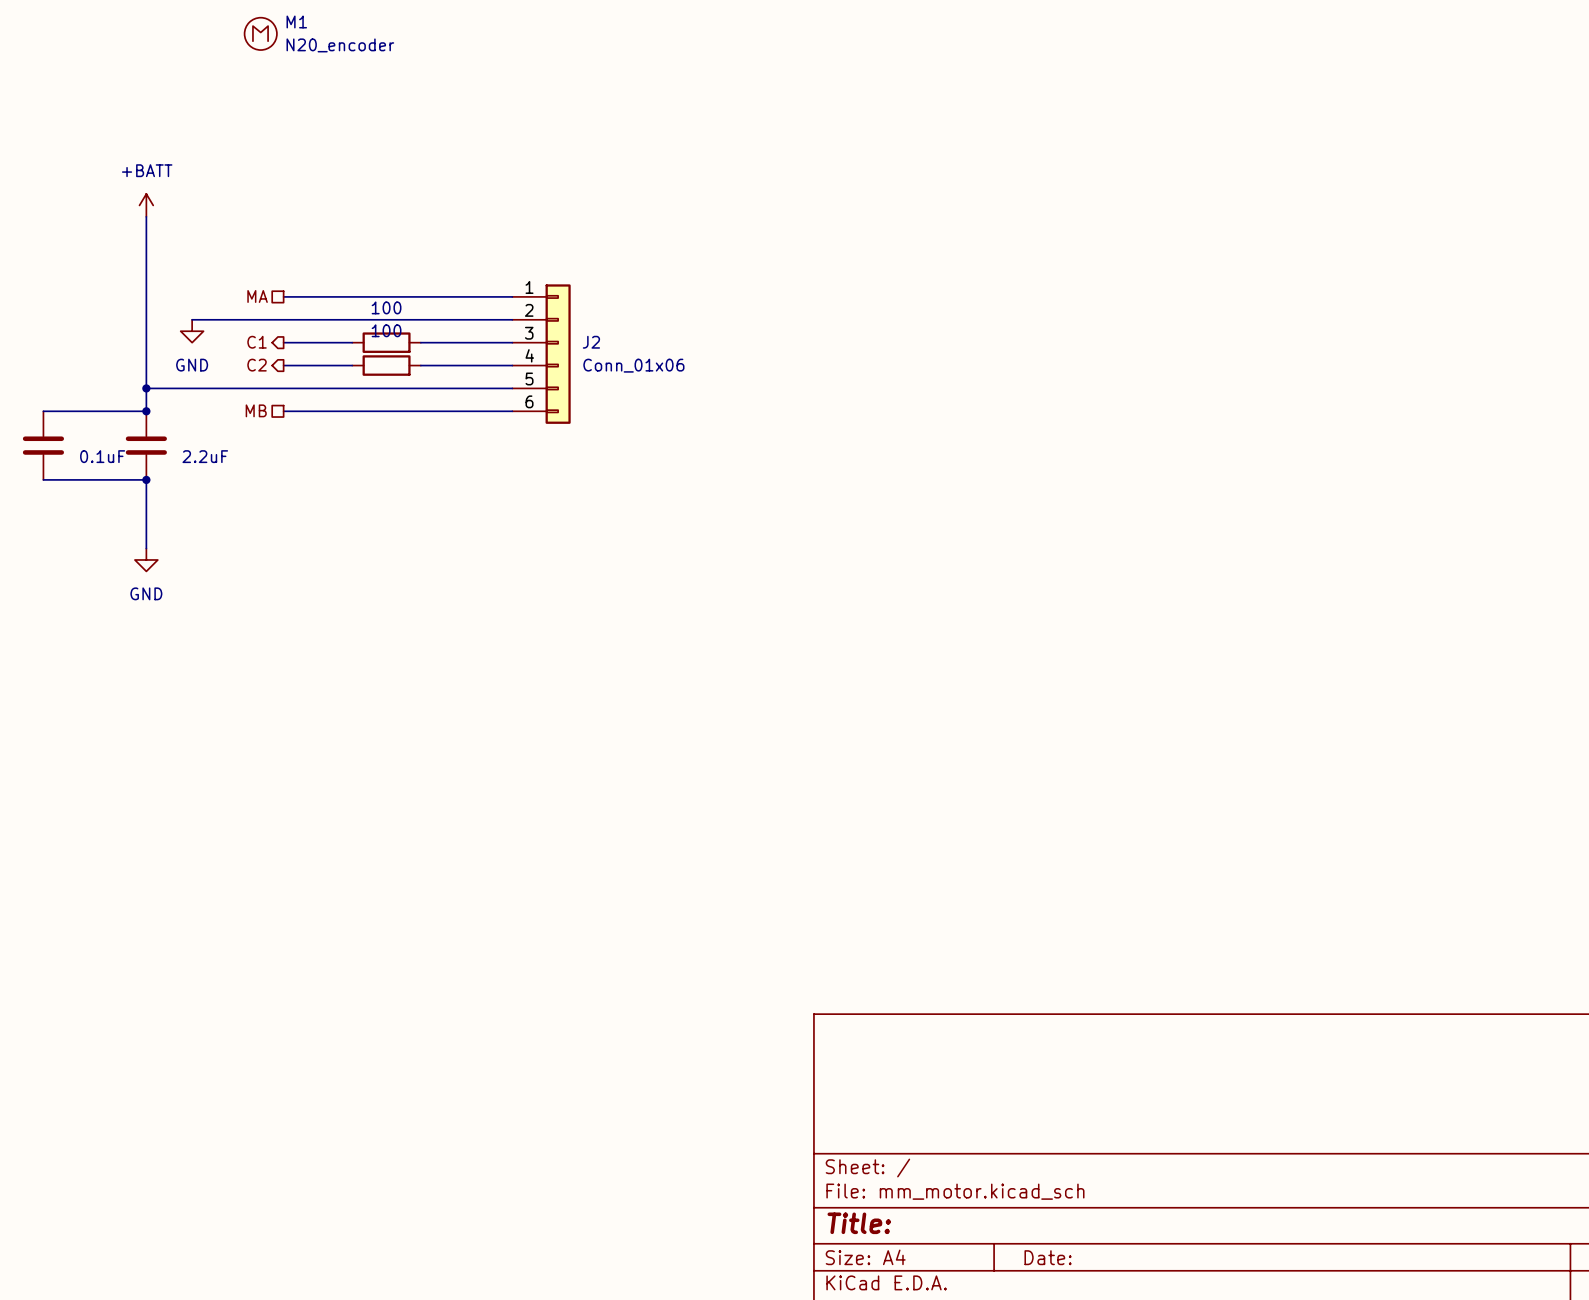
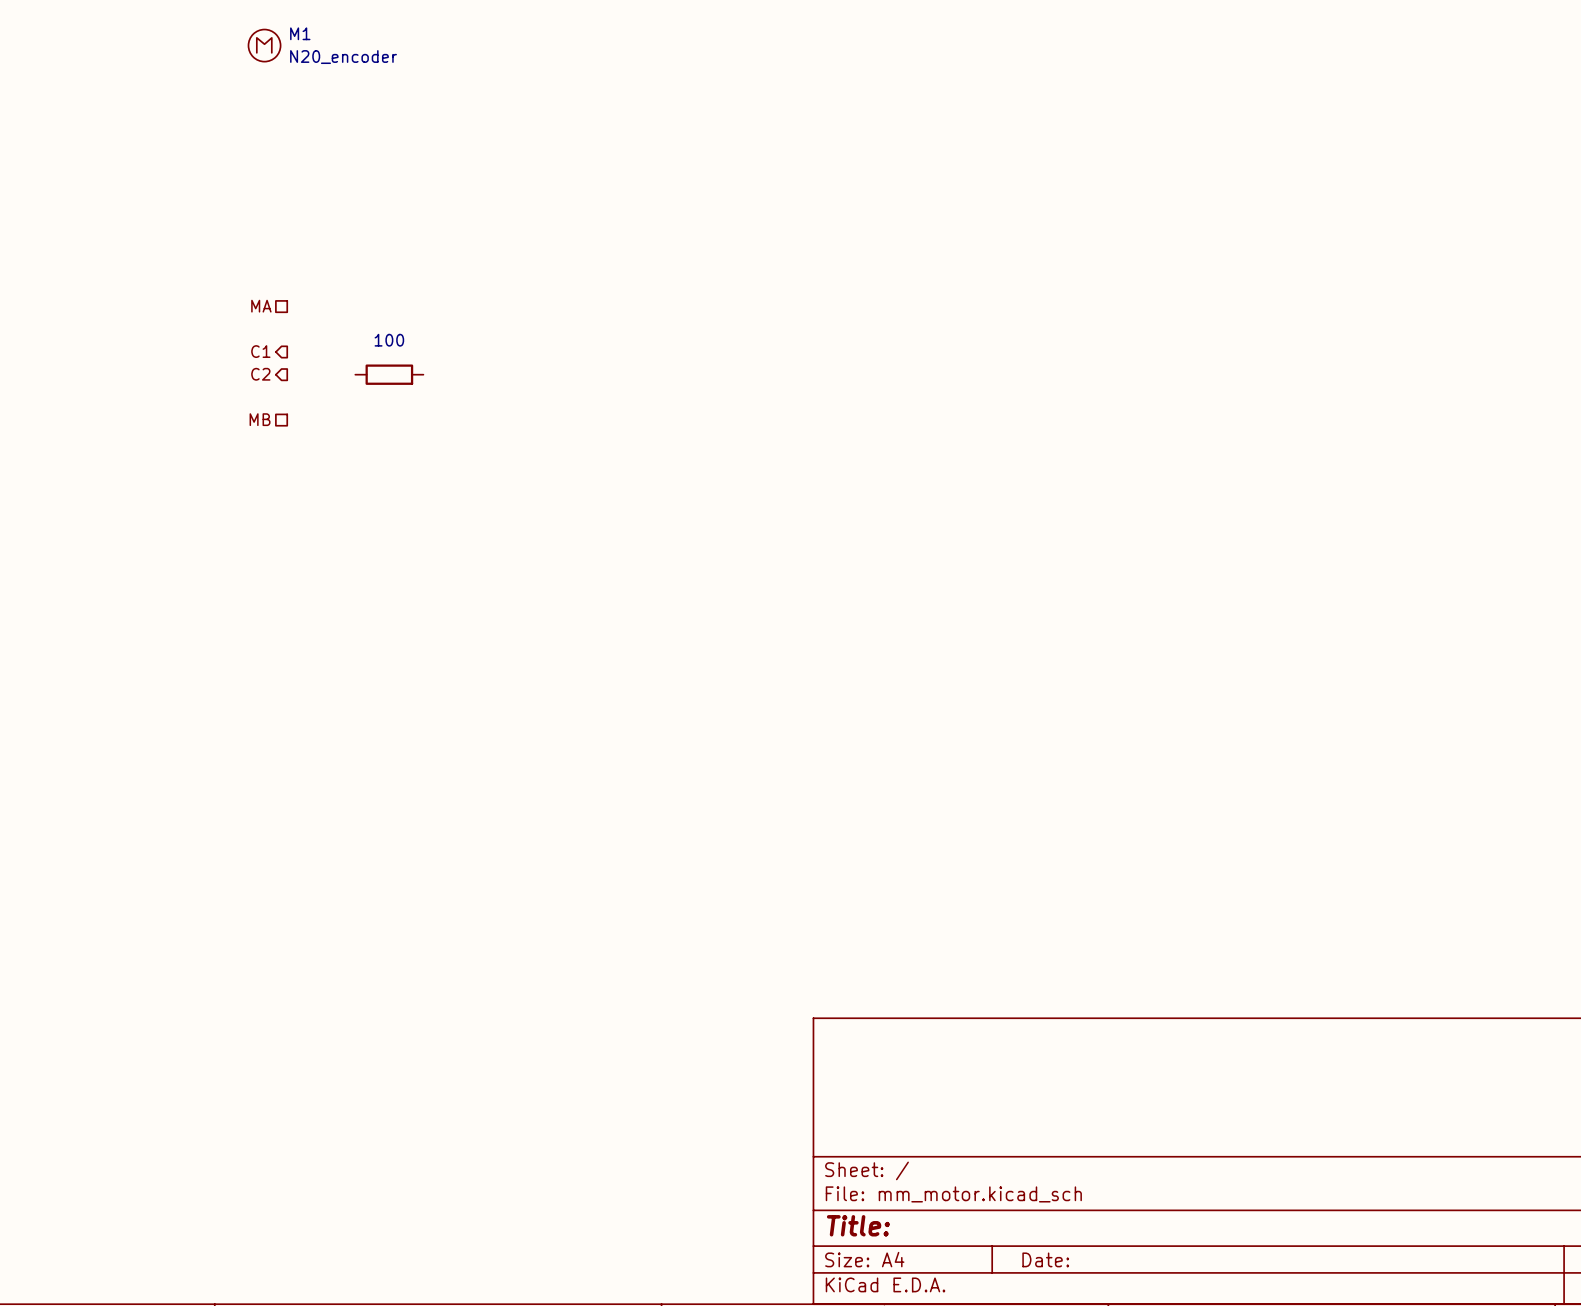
power symbol: +BATT (146, 205) -> none
wire: (146, 216) (146, 411) (43, 411) -> none
wire: (283, 296) (512, 296) -> none
wire: (192, 319) (512, 319) -> none
power symbol: GND (192, 331) -> none
wire: (283, 342) (352, 342) -> none
part: 100 (386, 342) -> none
wire: (420, 342) (512, 342) -> none
J2: Conn_01x06 (541, 354) -> none
wire: (283, 365) (352, 365) -> none
wire: (420, 365) (512, 365) -> none
wire: (146, 388) (512, 388) -> none
junction: (146, 388) -> none
junction: (146, 411) -> none
wire: (283, 411) (512, 411) -> none
part: 0.1uF (43, 445) -> none
part: 2.2uF (146, 445) -> none
wire: (43, 479) (146, 479) (146, 548) -> none
junction: (146, 479) -> none
power symbol: GND (146, 559) -> none

